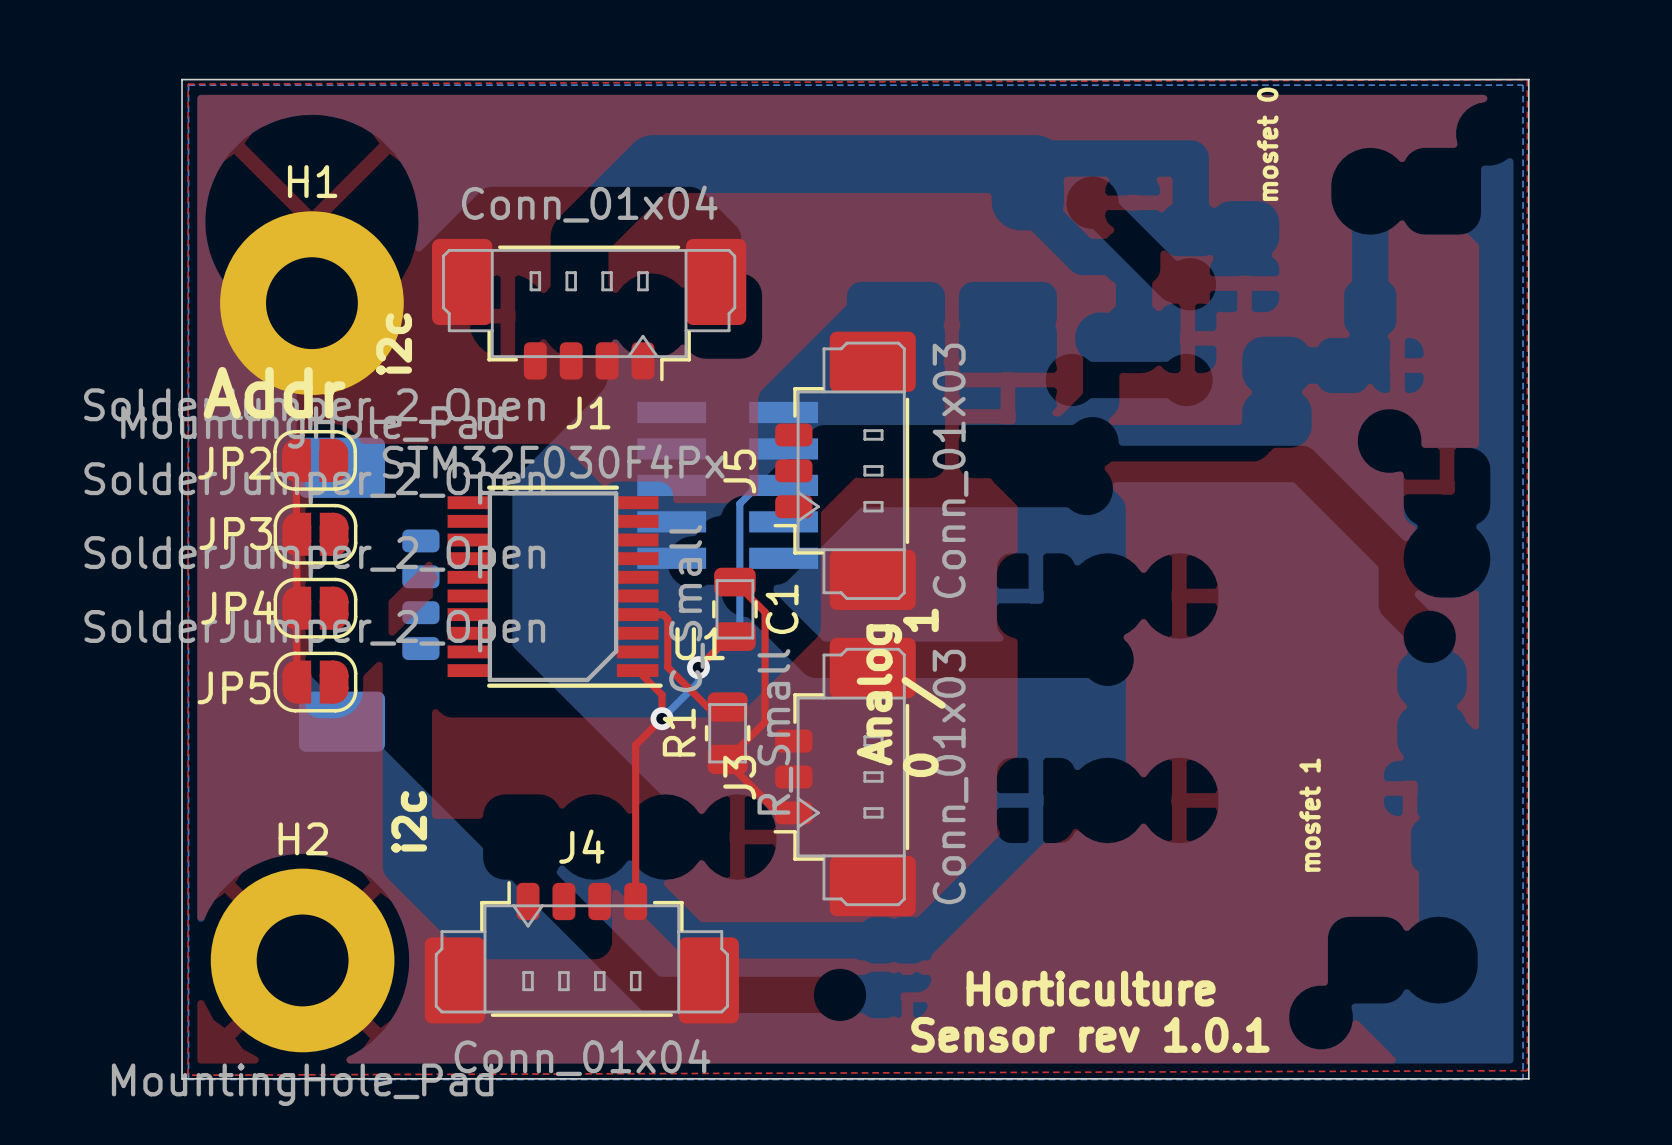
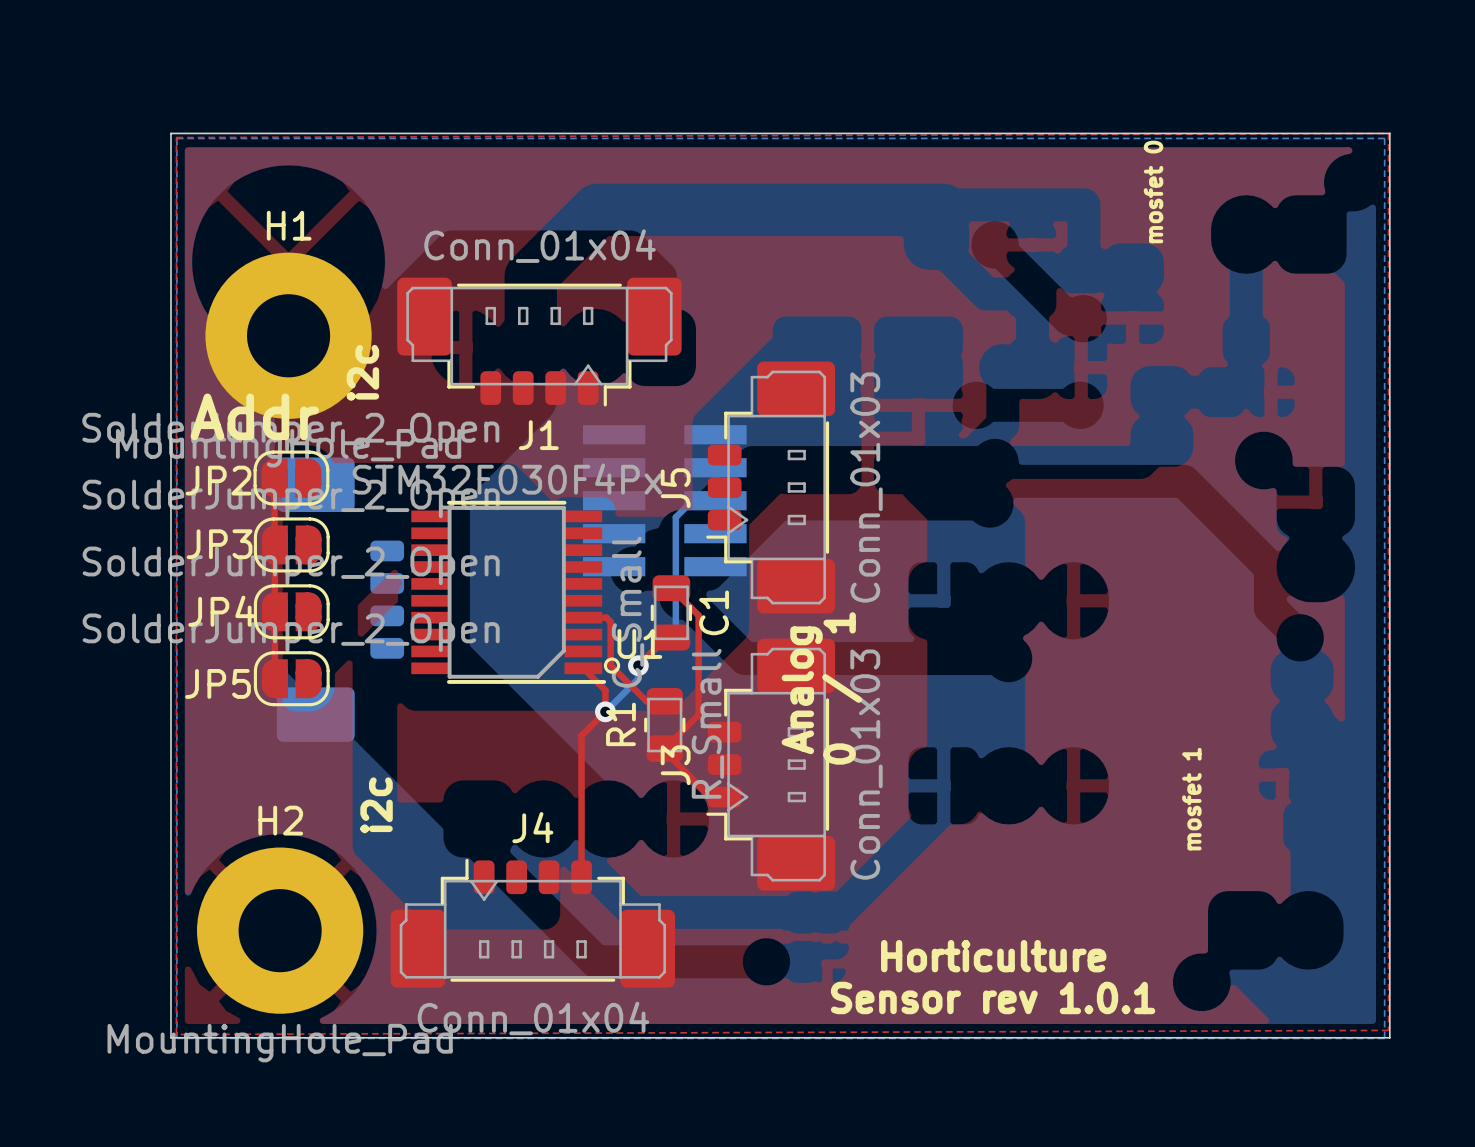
drawing: none -> [603, 657, 621, 674]

